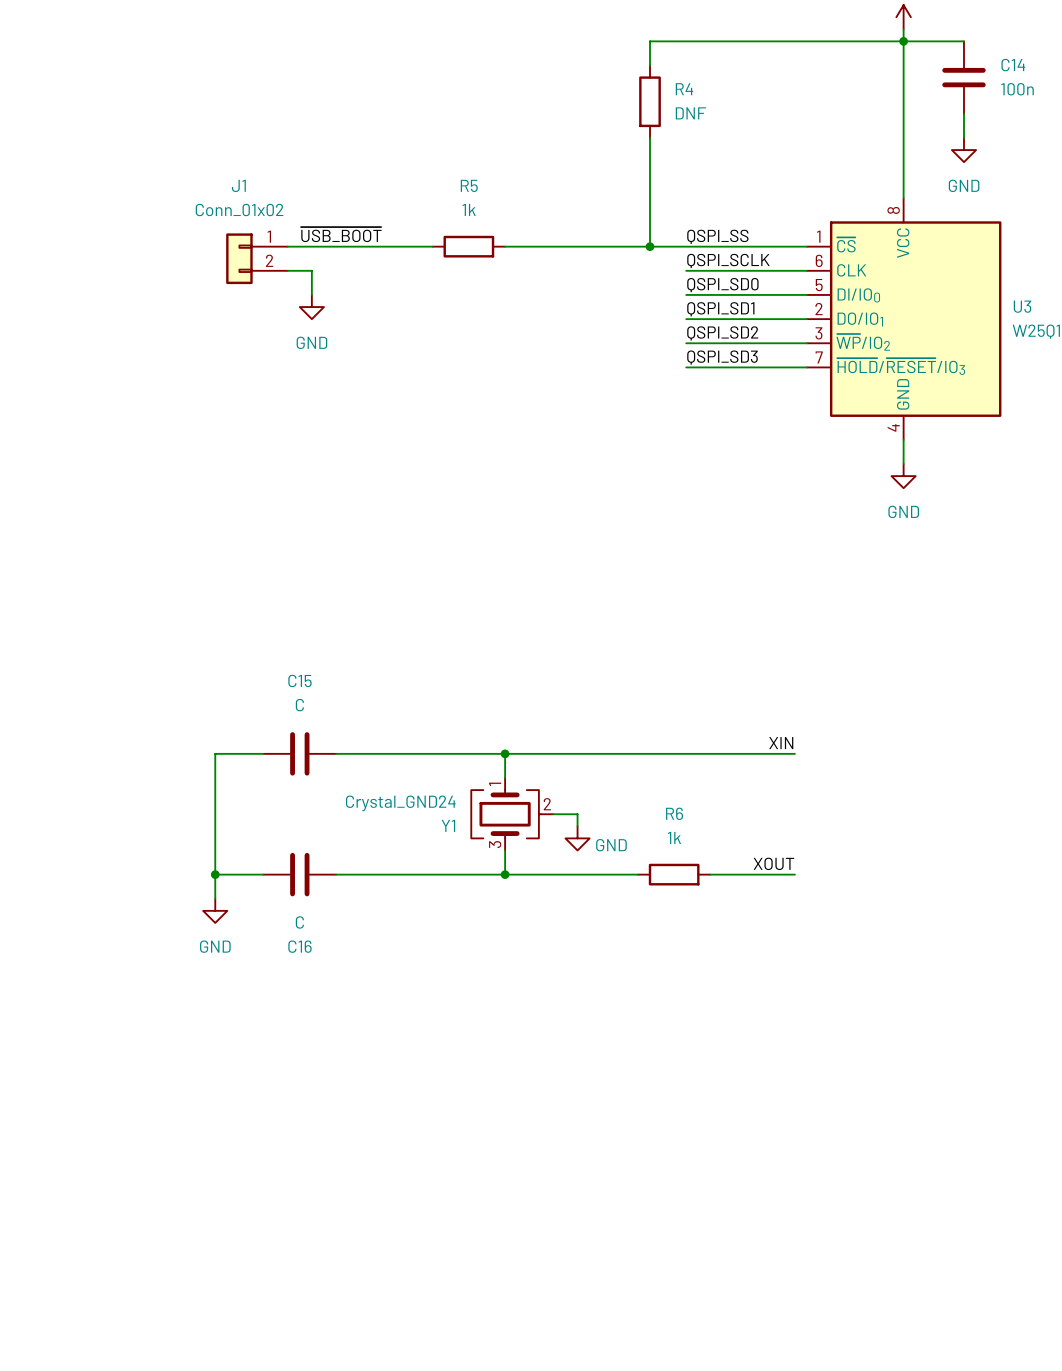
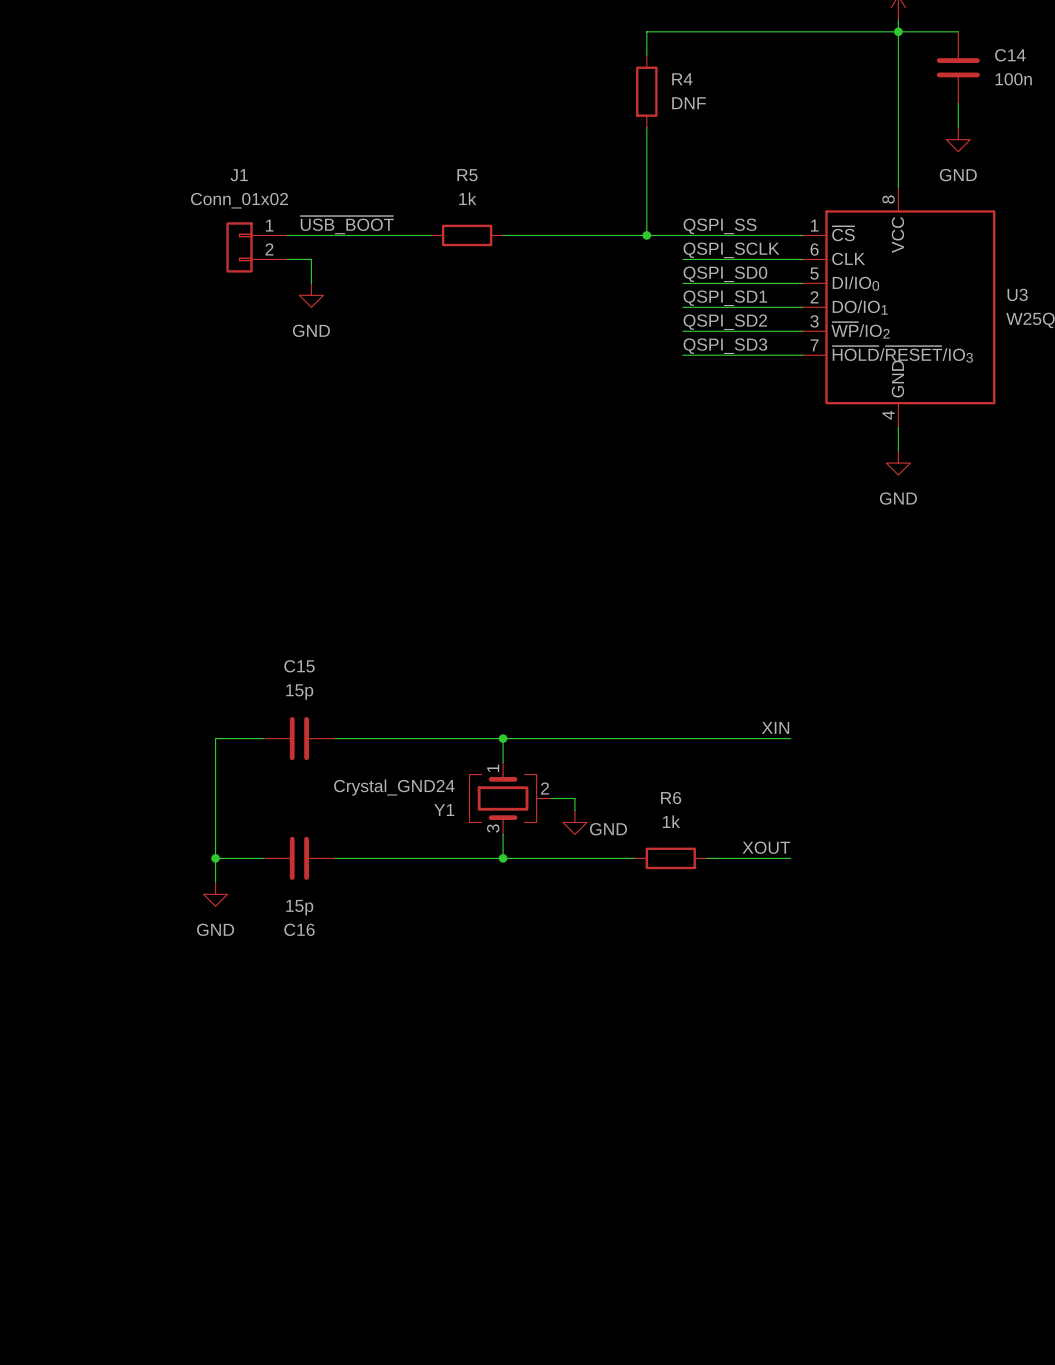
C15 value: C (299, 705) -> 15p (299, 692)
C16 value: C (299, 922) -> 15p (299, 907)

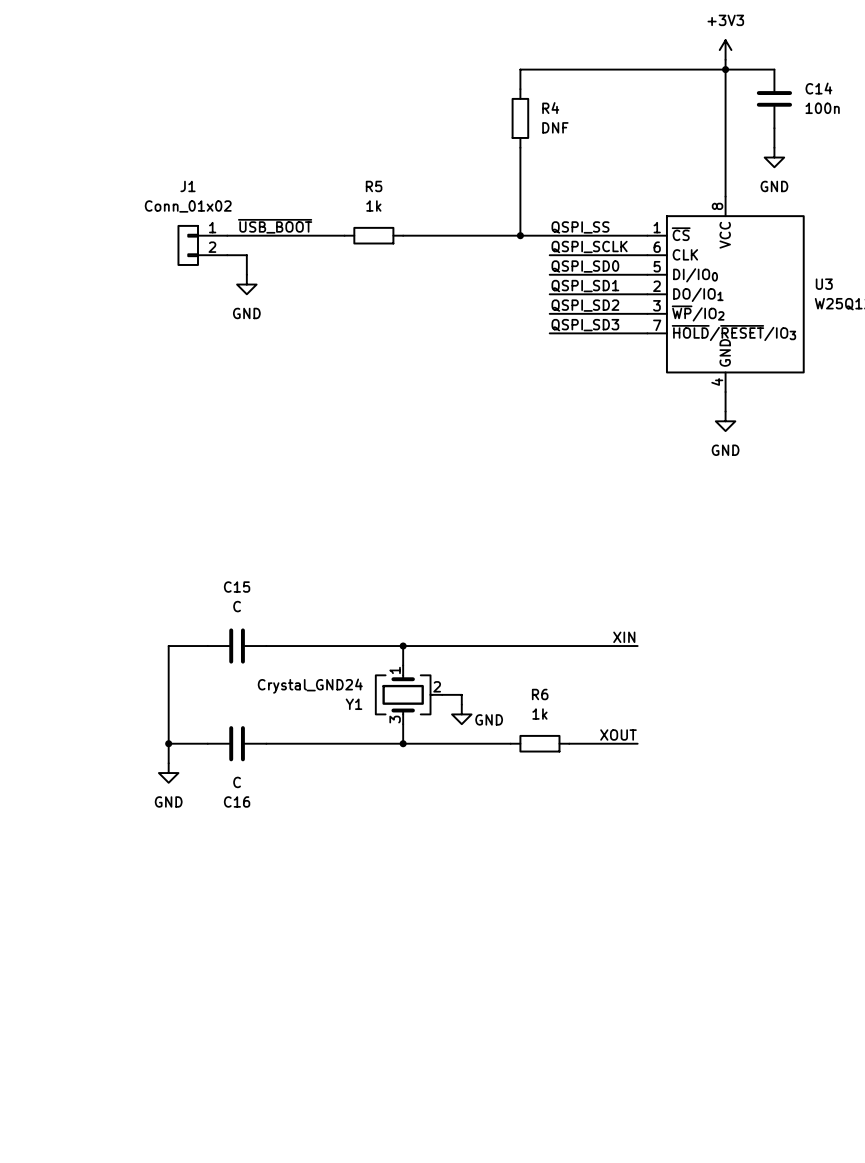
C15 value: 15p (299, 692) -> C (237, 606)
C16 value: 15p (299, 907) -> C (237, 782)

